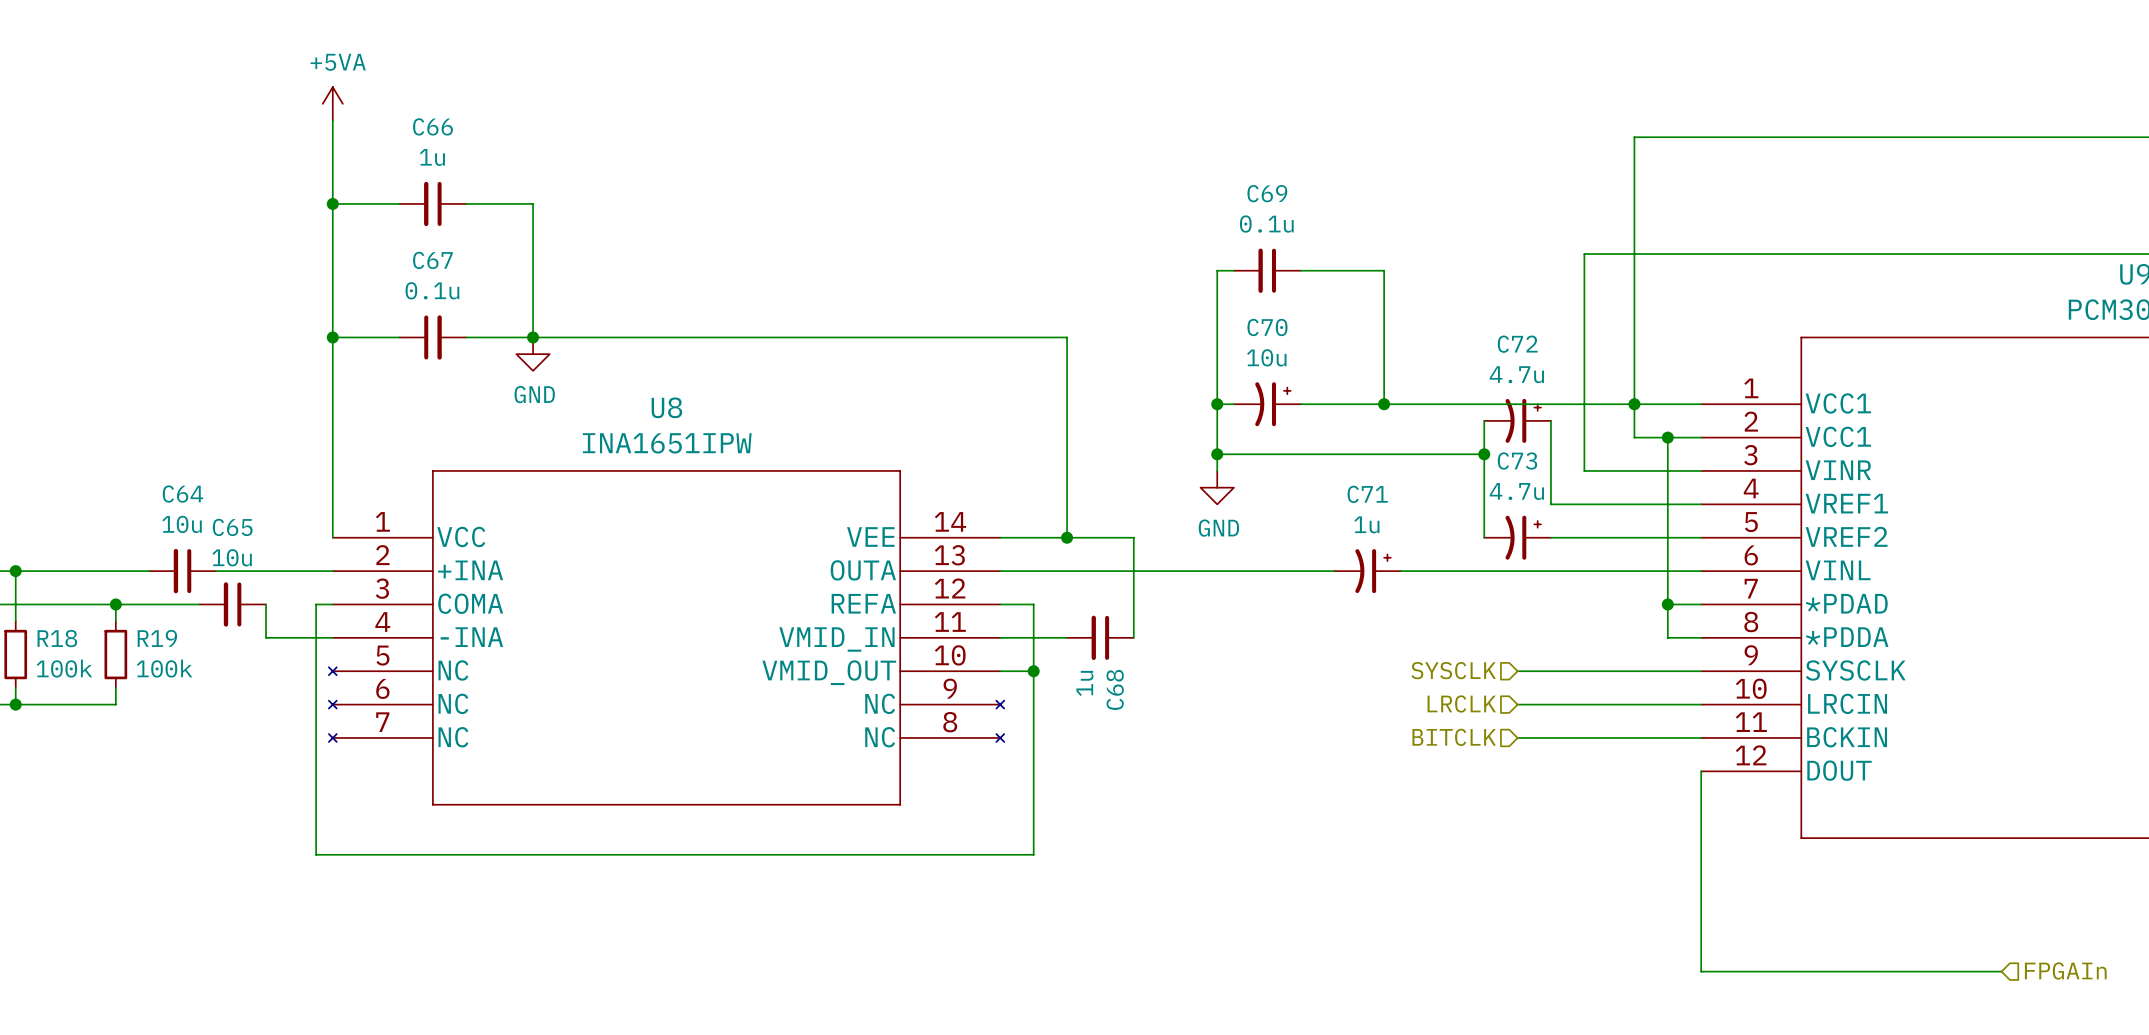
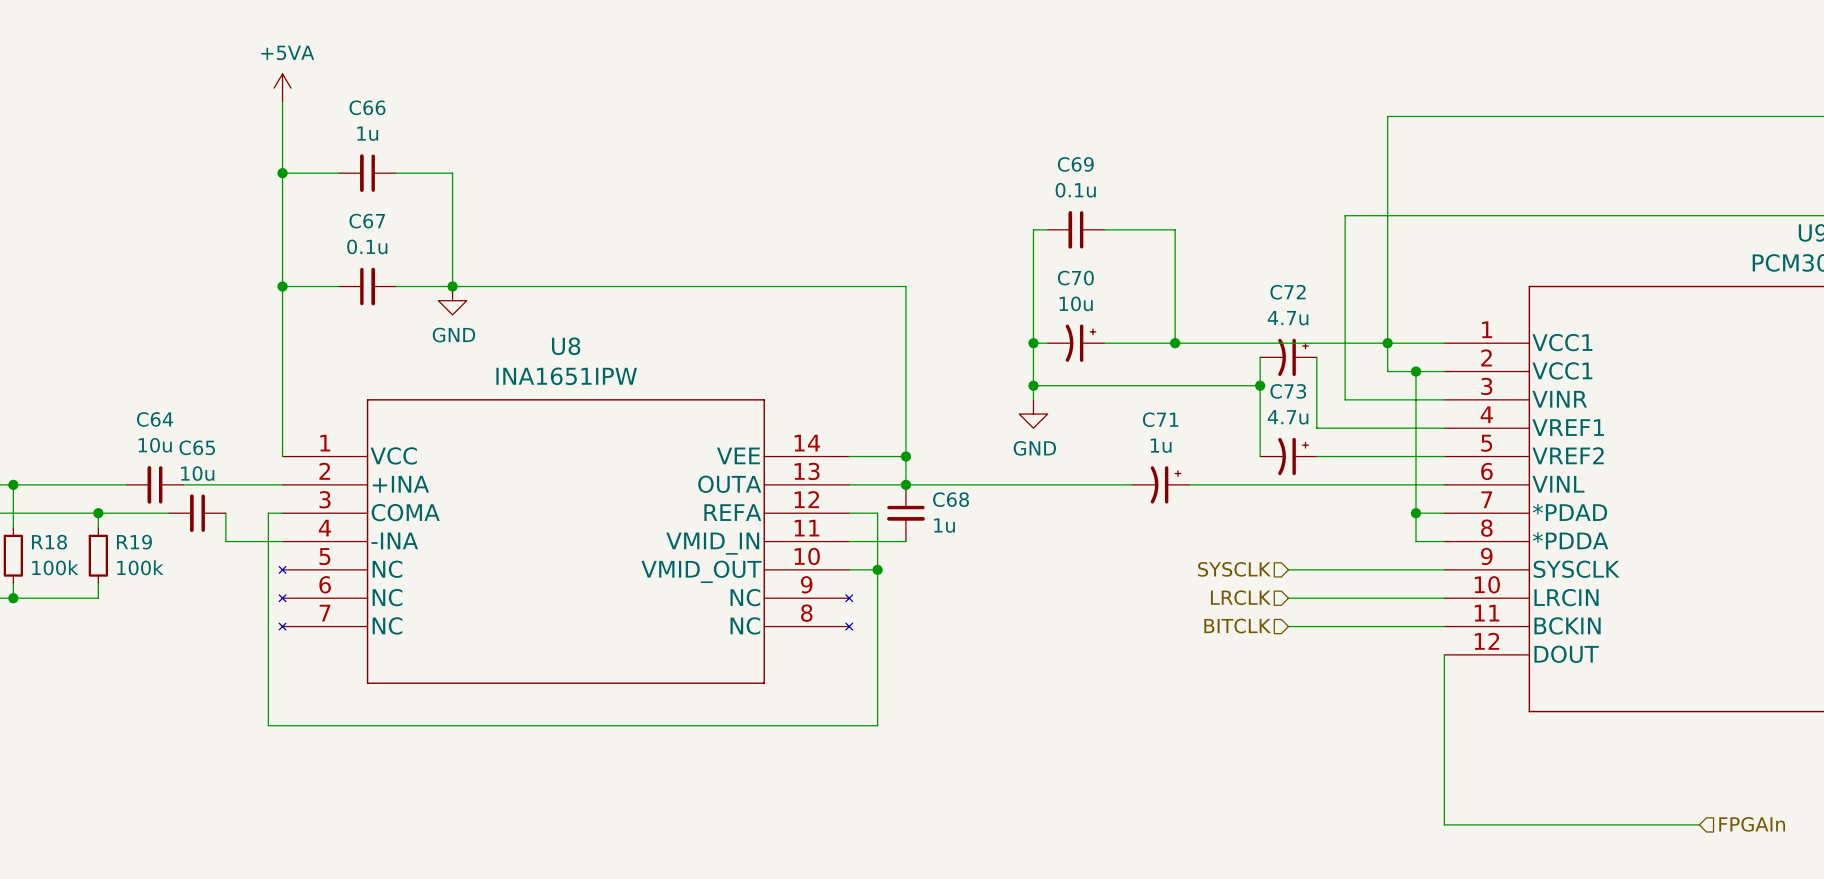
wire: (1067, 537) (1133, 537) (1133, 637) -> (905, 456) (905, 484)
junction: none -> (905, 484)
C68 rotation: 0° (1100, 637) -> 90° counterclockwise (905, 513)
C68 position: (1100, 637) -> (905, 513)

